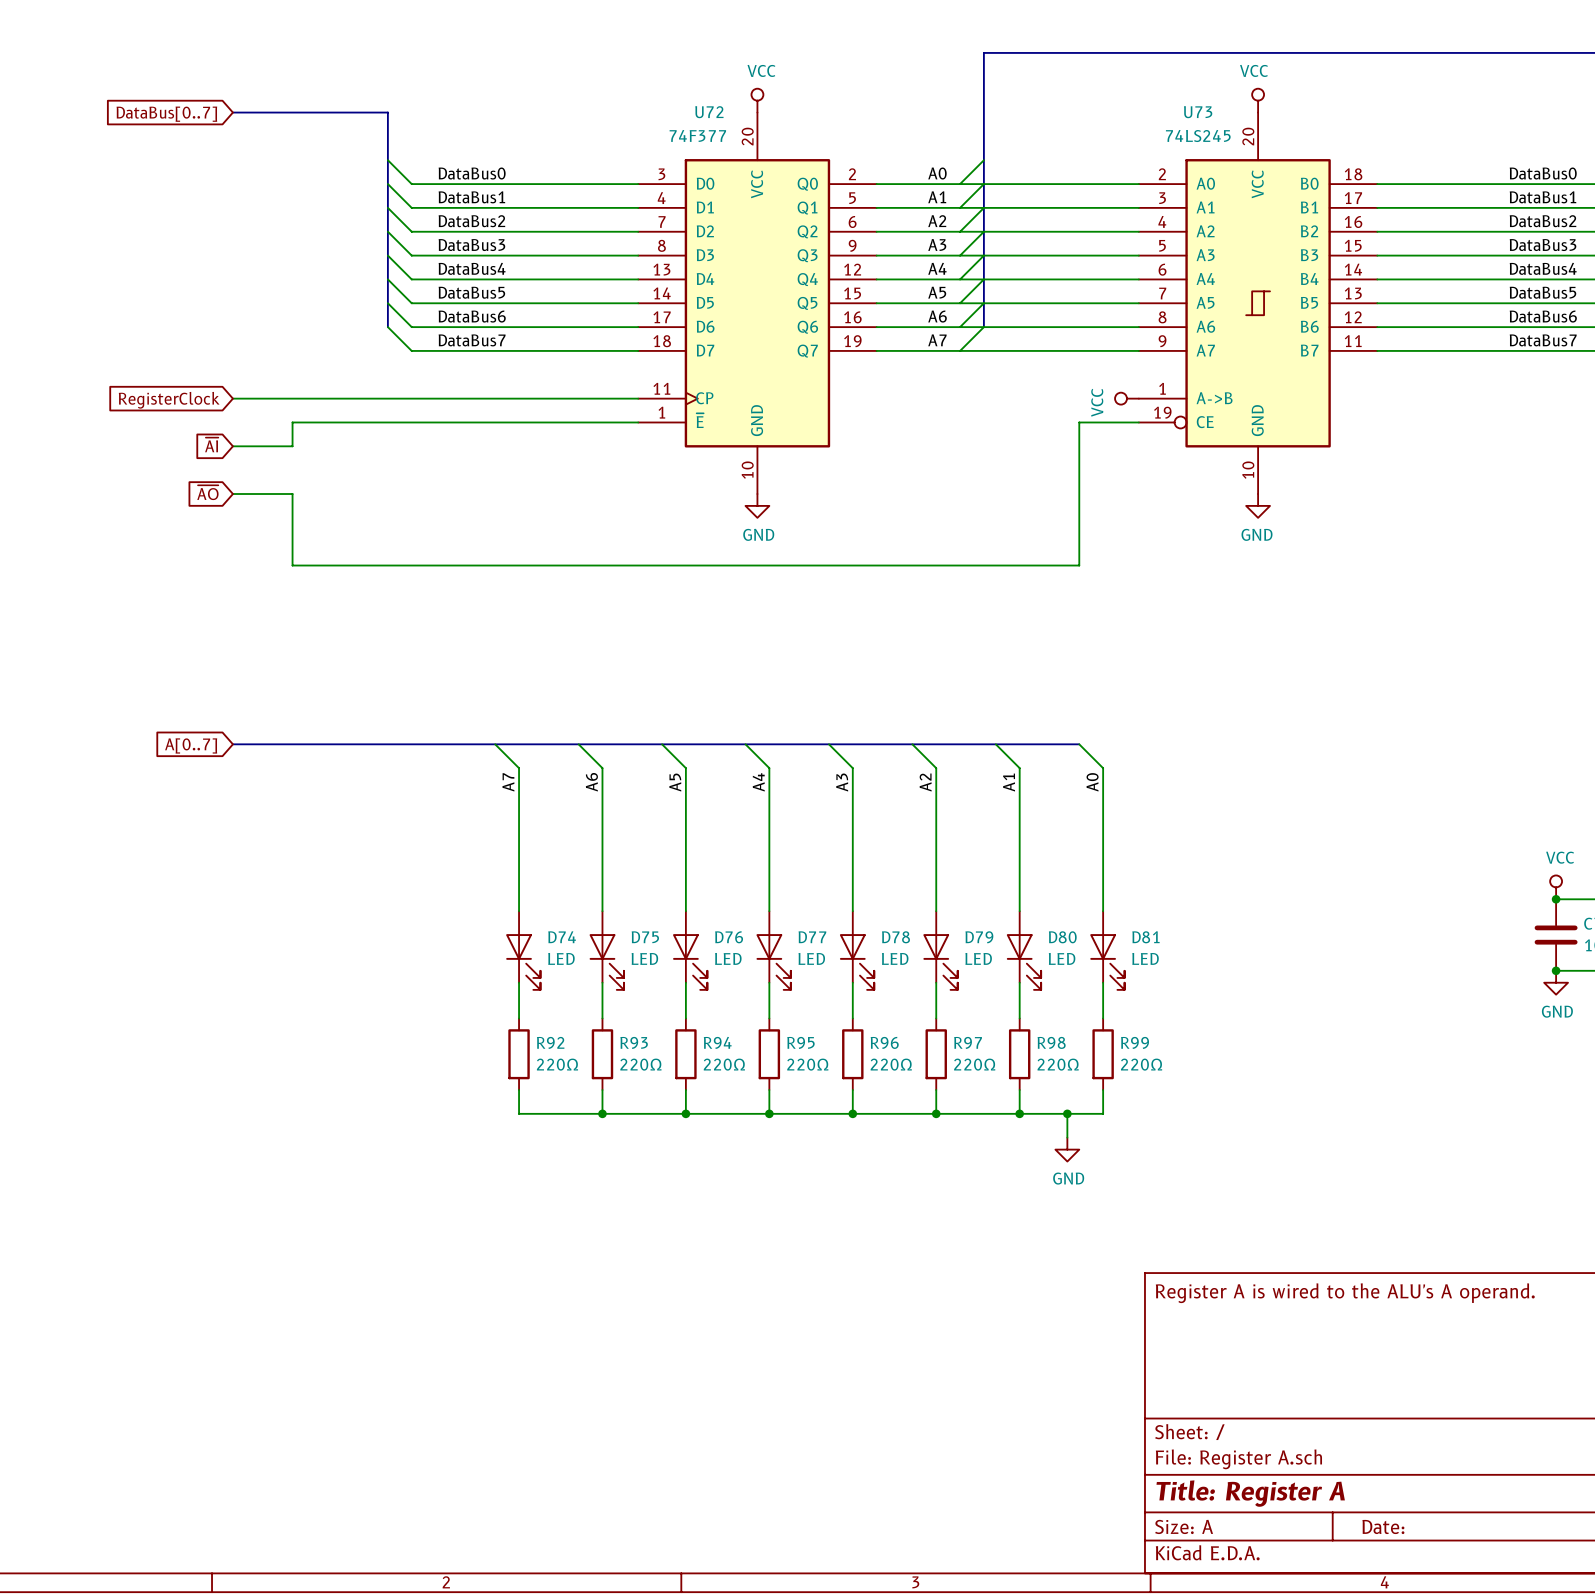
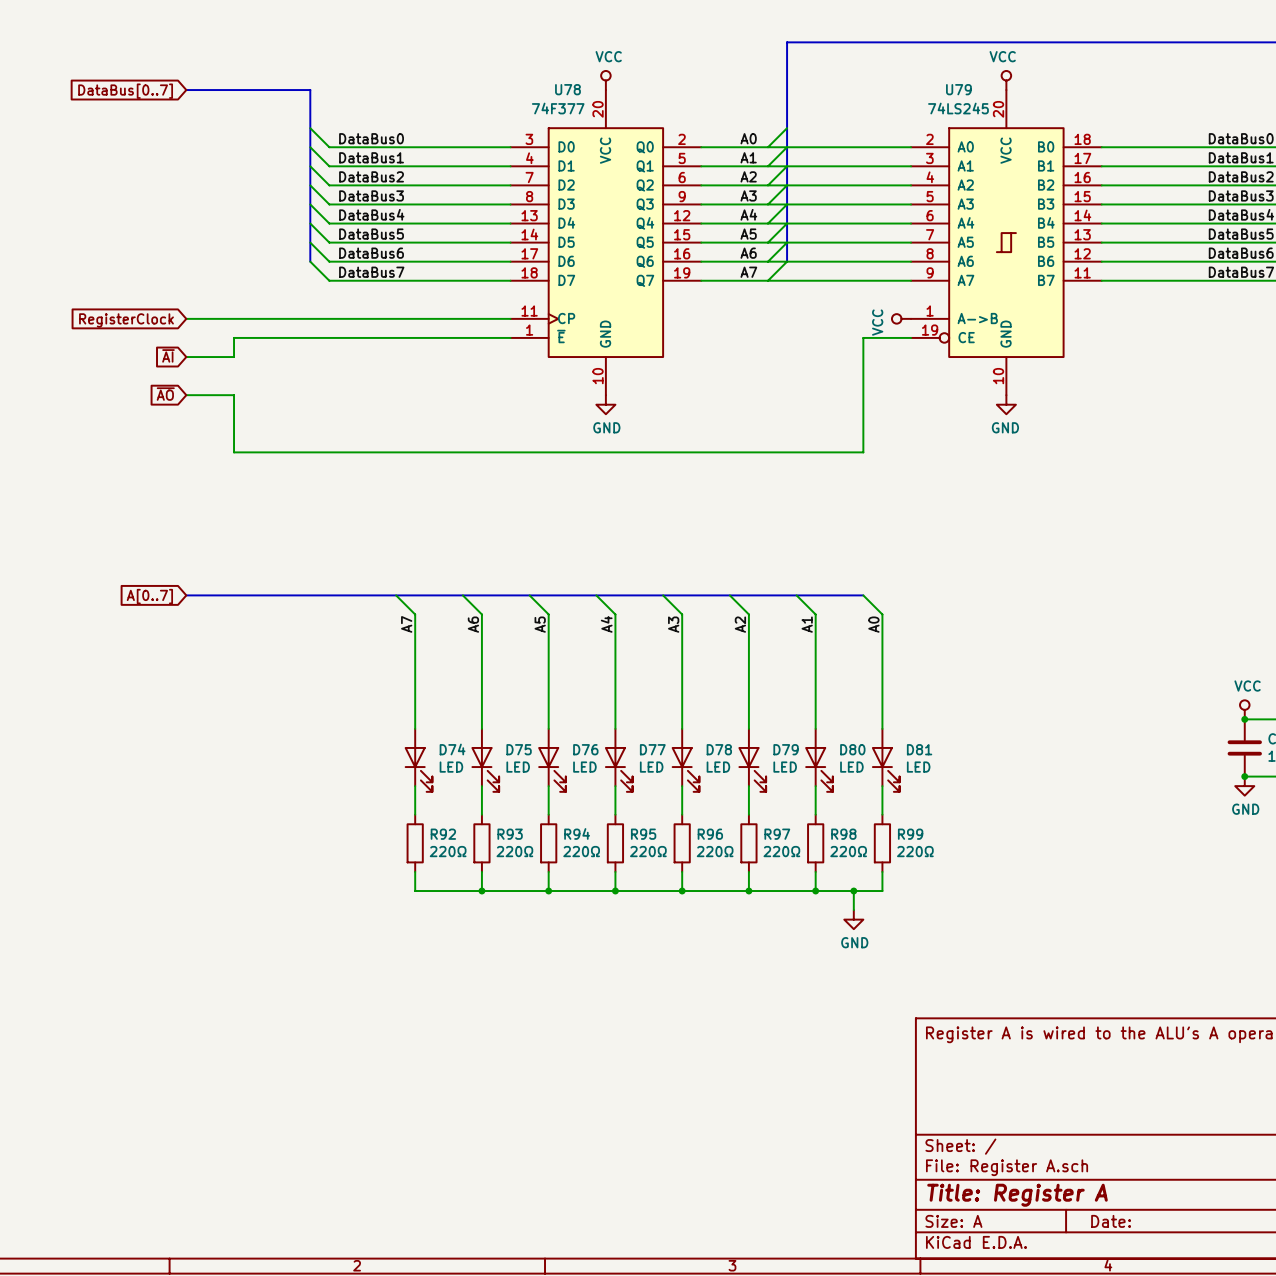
U72 name: U72 (709, 112) -> U78 (567, 89)
U73 name: U73 (1198, 112) -> U79 (958, 89)

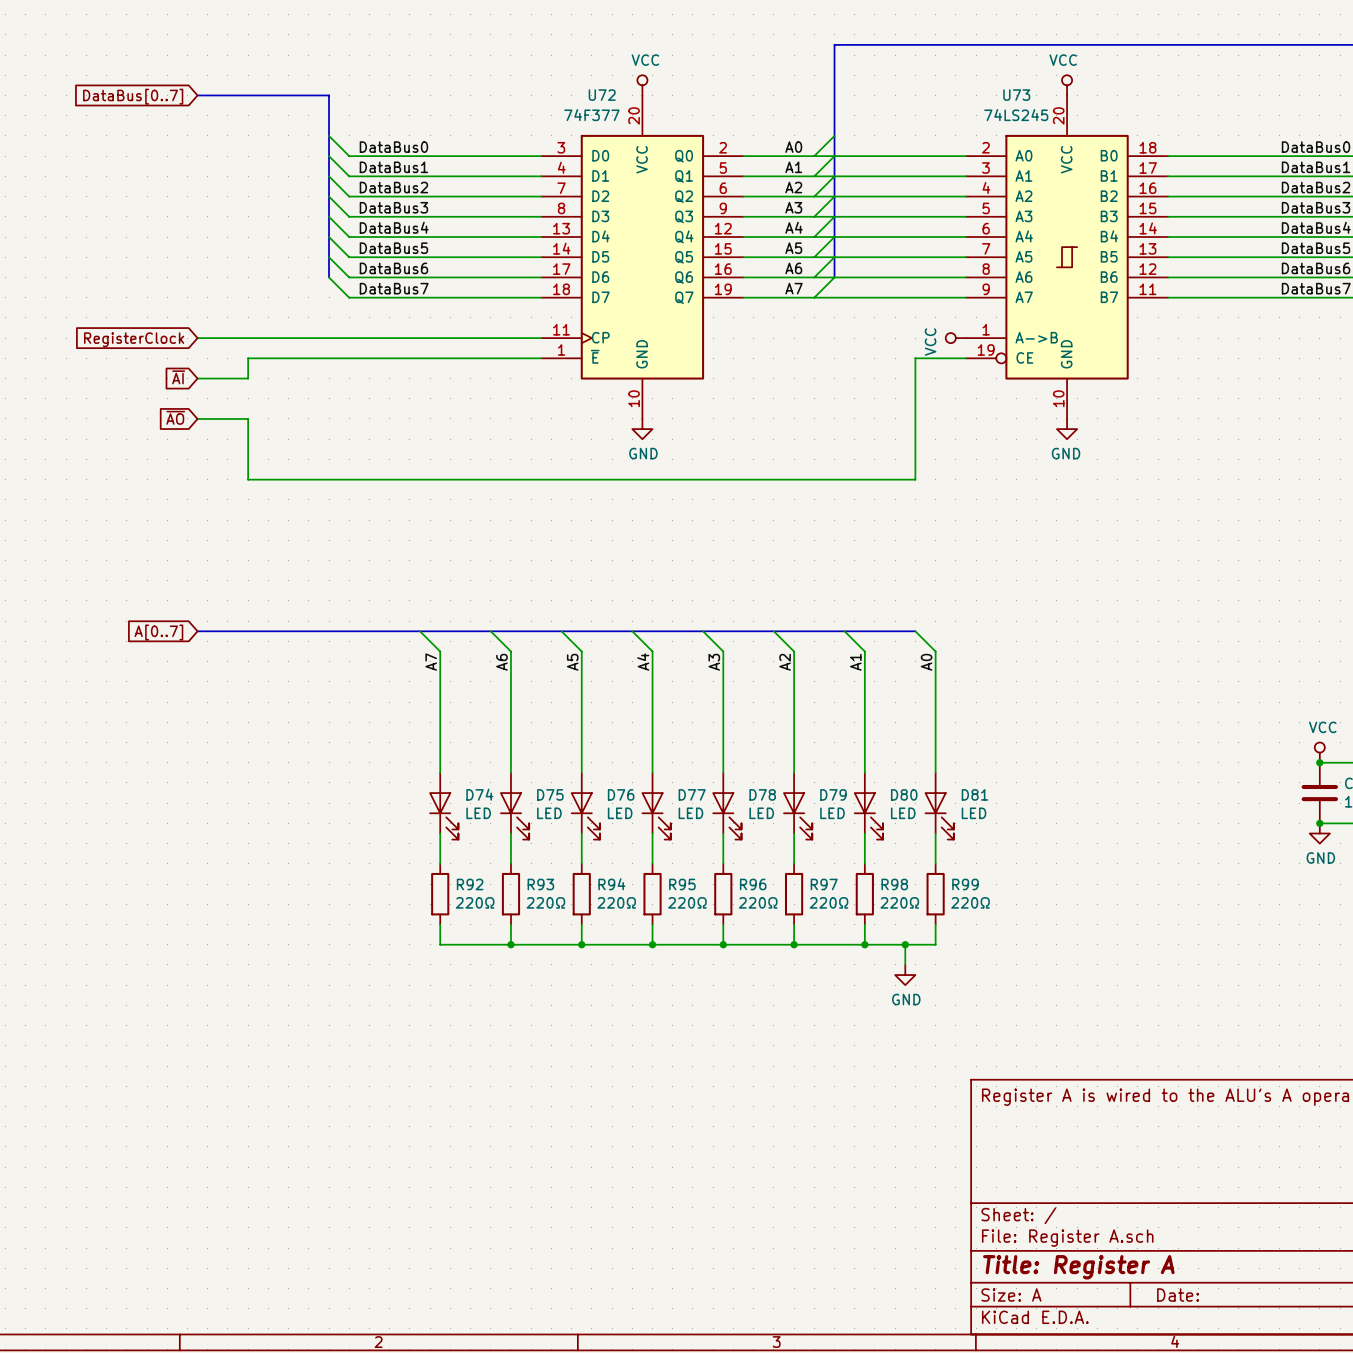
U78 name: U78 (567, 89) -> U72 (602, 95)
U79 name: U79 (958, 89) -> U73 (1016, 95)

